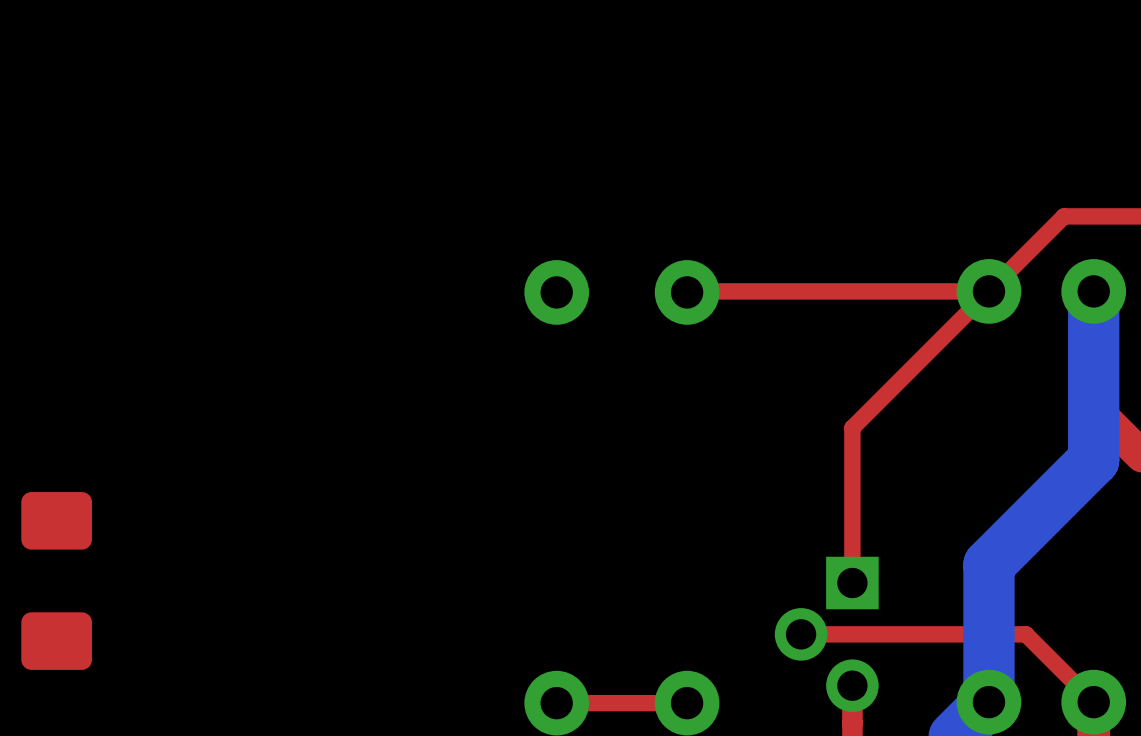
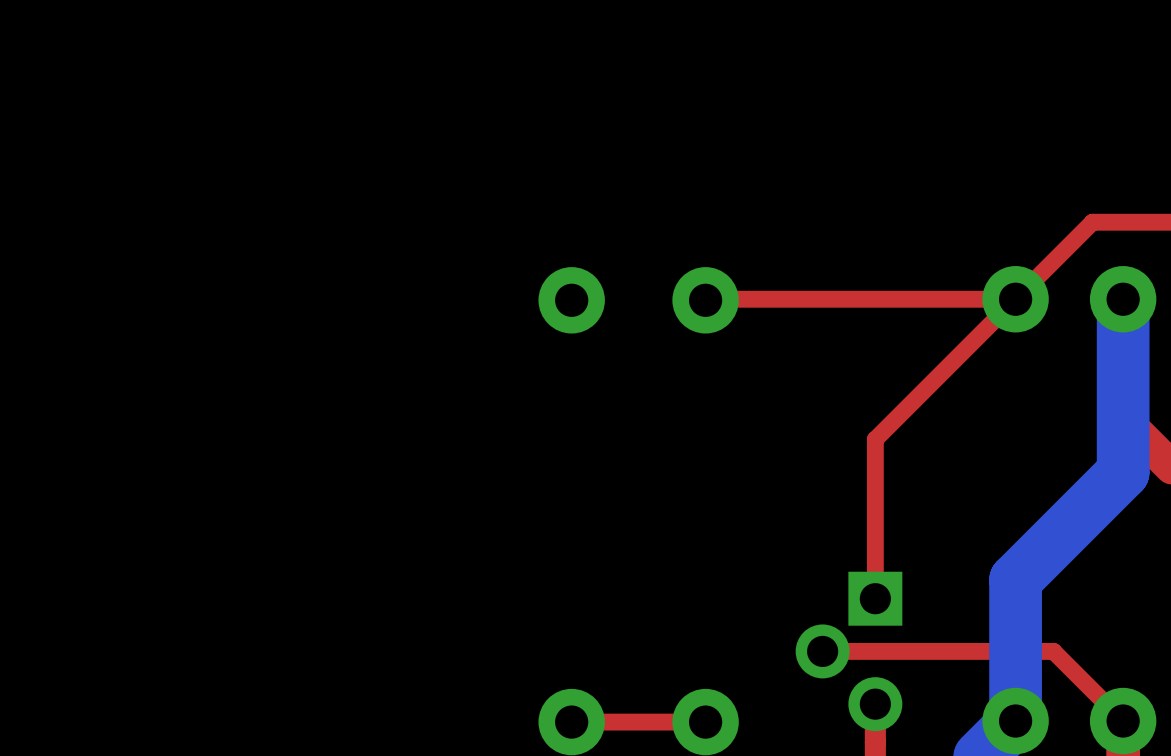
part: (56, 580) -> none

